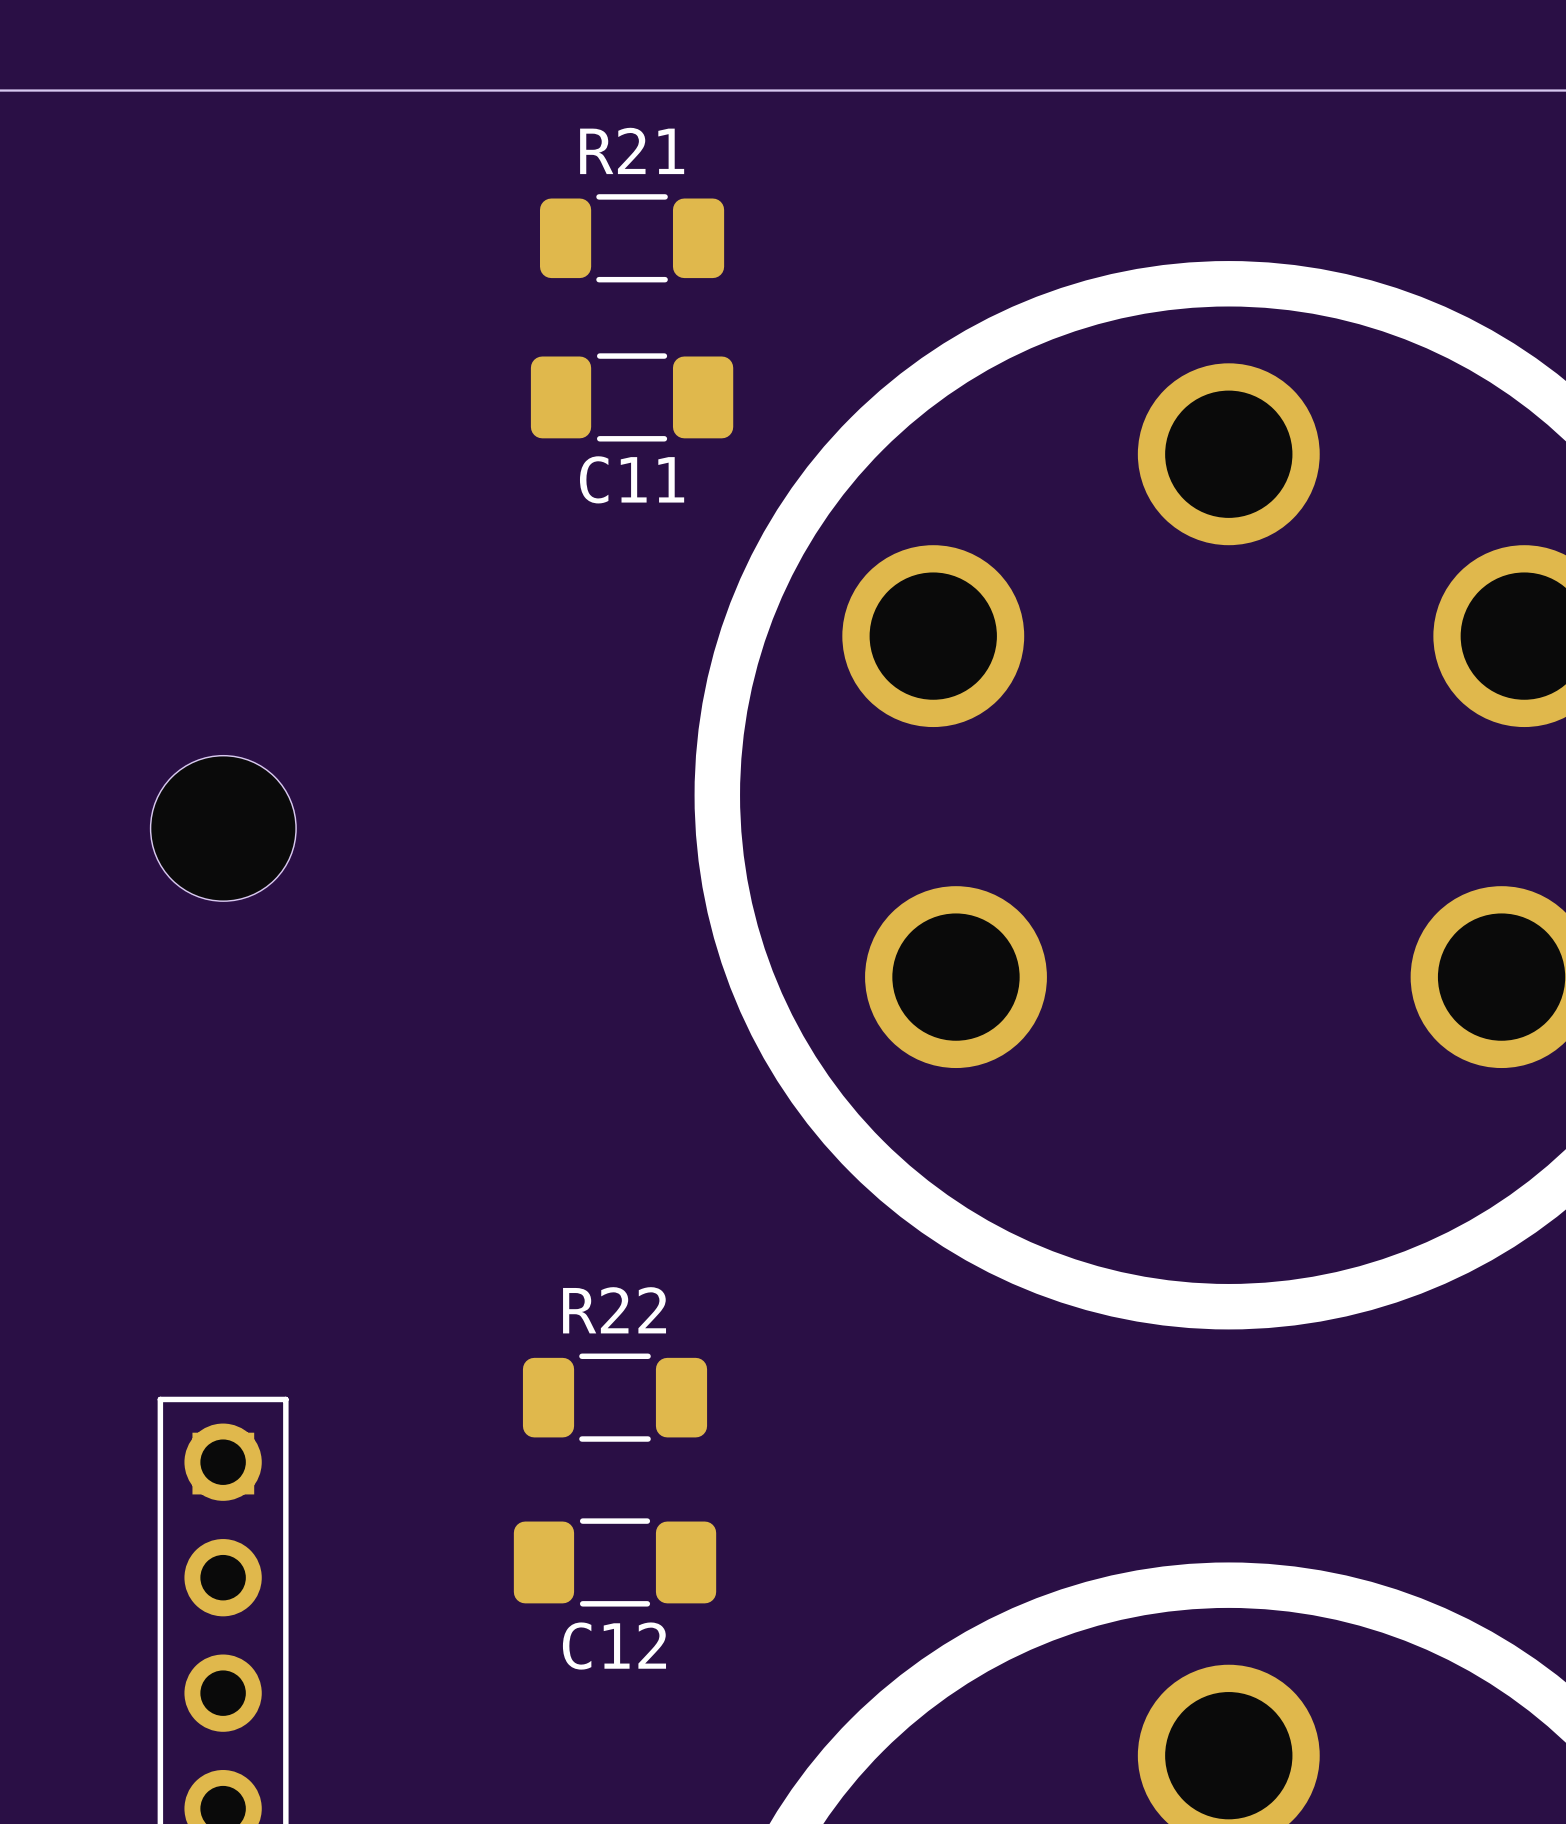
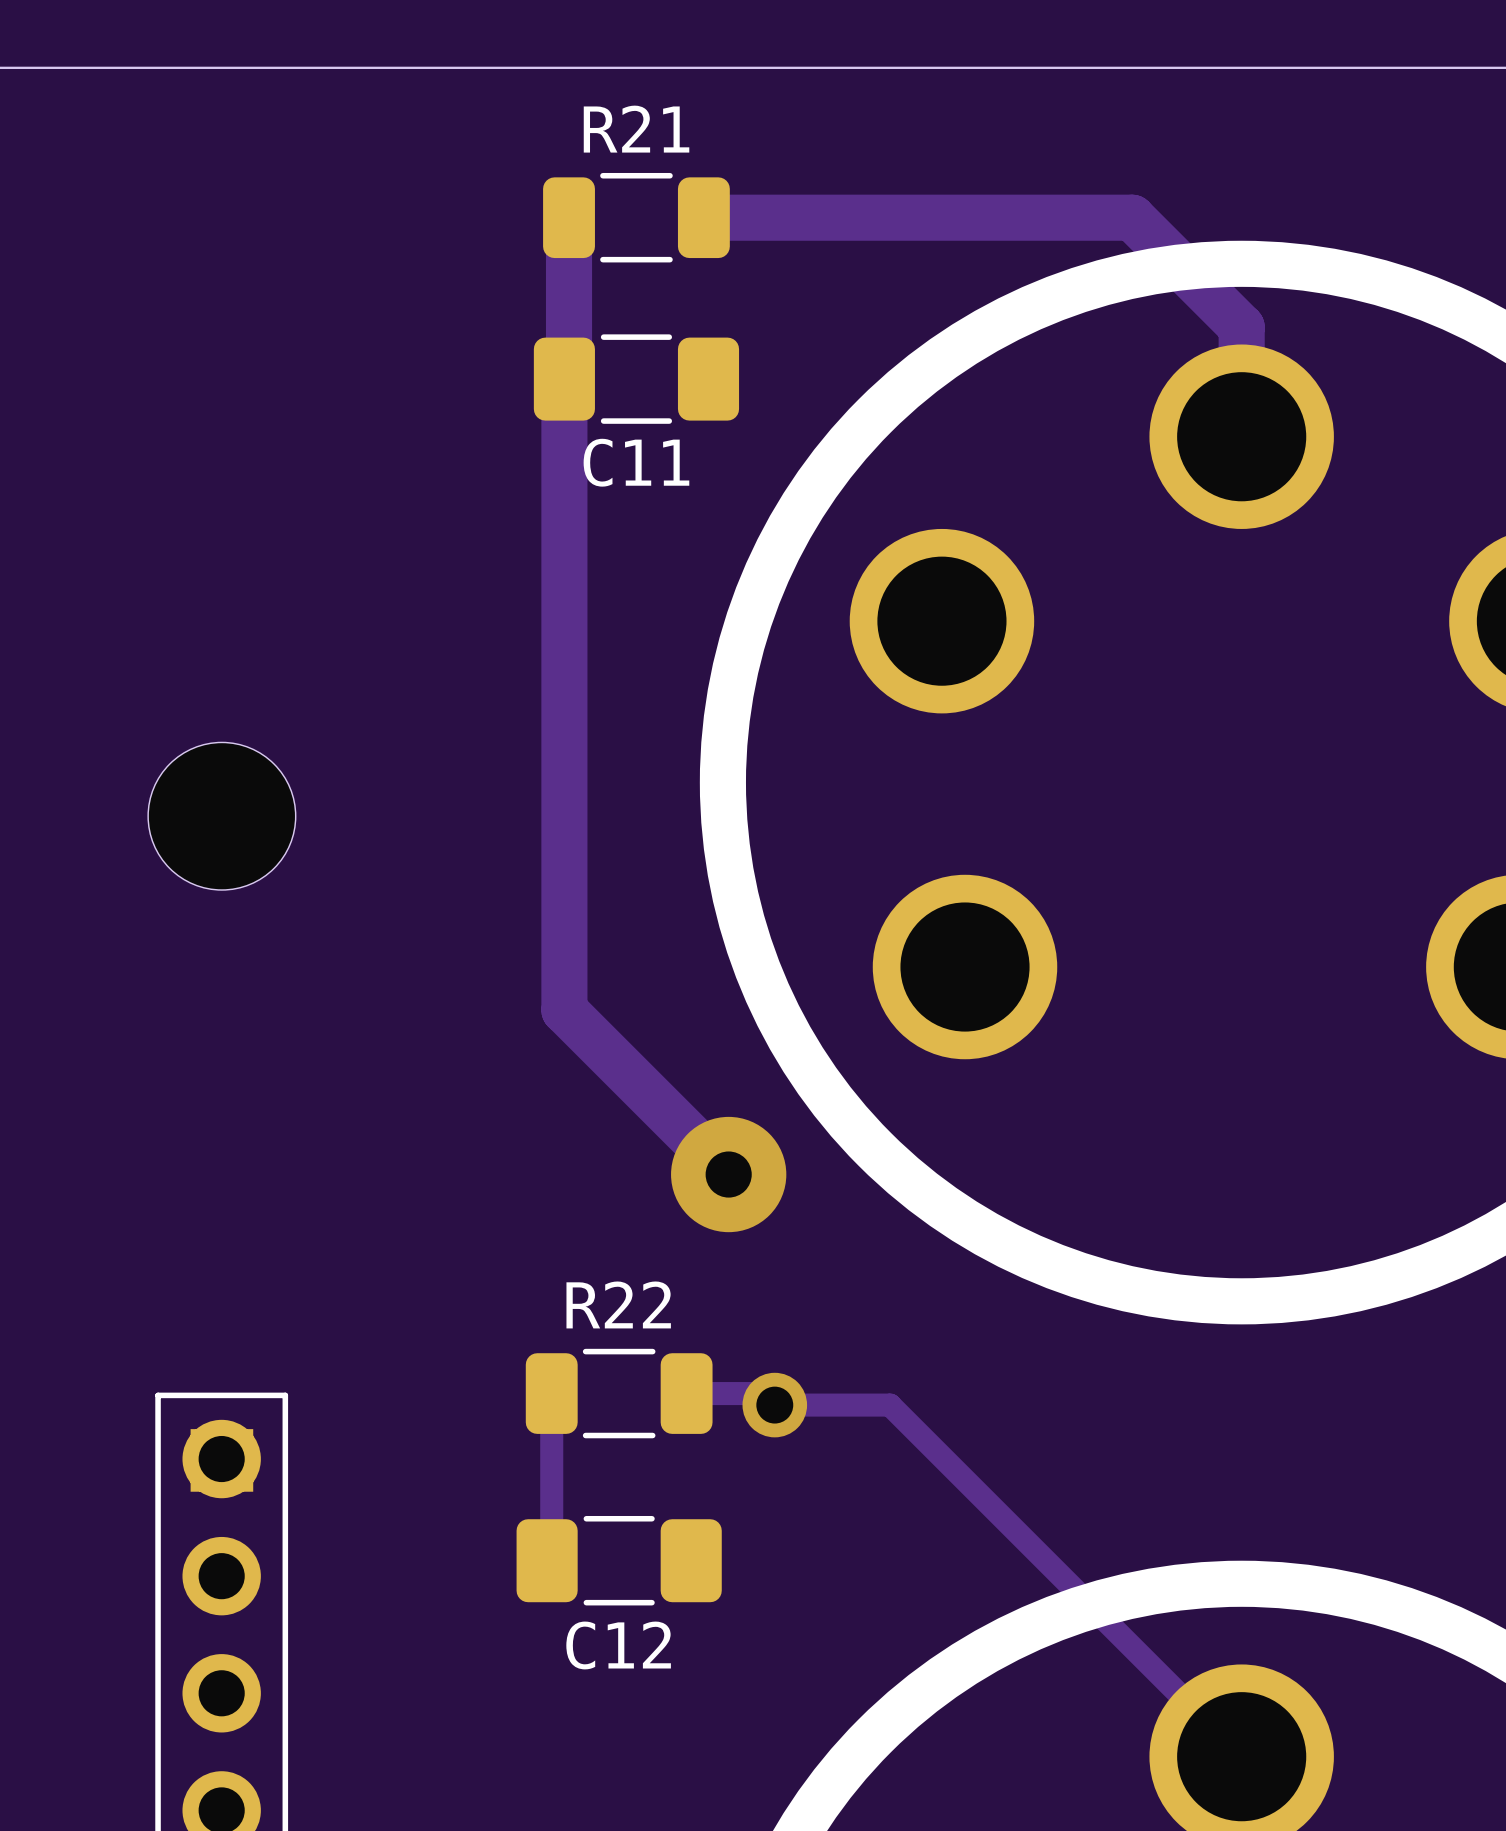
track: none -> (569, 217) (569, 374) (564, 379) (564, 1010) (728, 1174)
track: none -> (703, 217) (1132, 217) (1241, 327) (1241, 436)
via: none -> (728, 1174)
track: none -> (551, 1393) (551, 1556) (547, 1560)
track: none -> (686, 1393) (763, 1393) (774, 1405) (890, 1405) (1241, 1756)
via: none -> (774, 1405)

